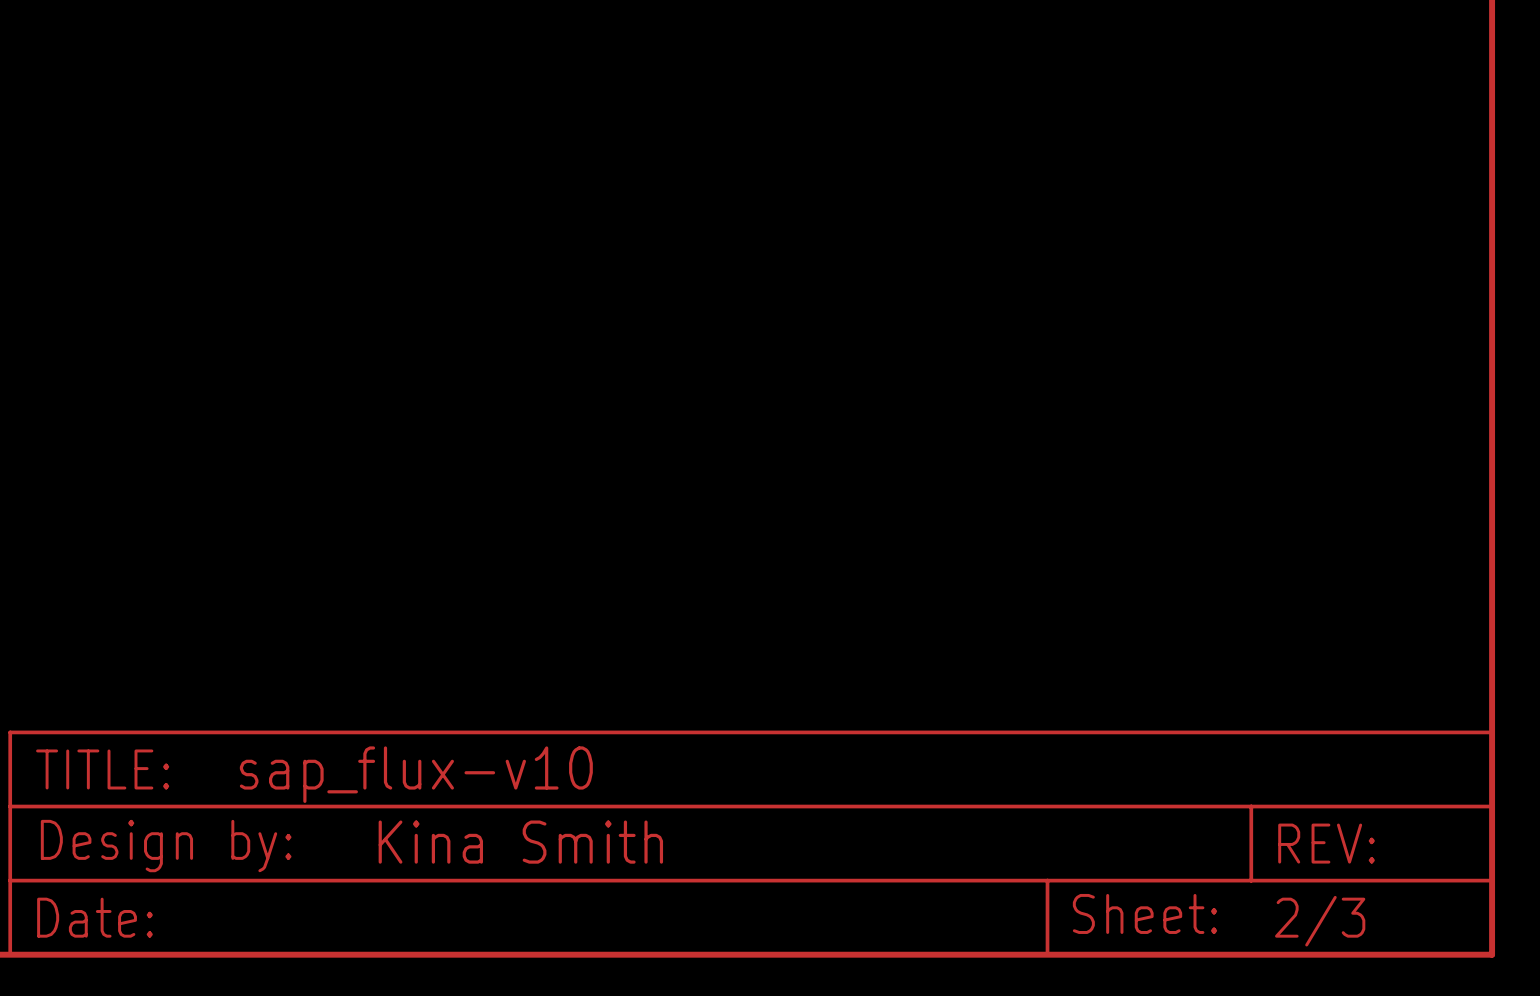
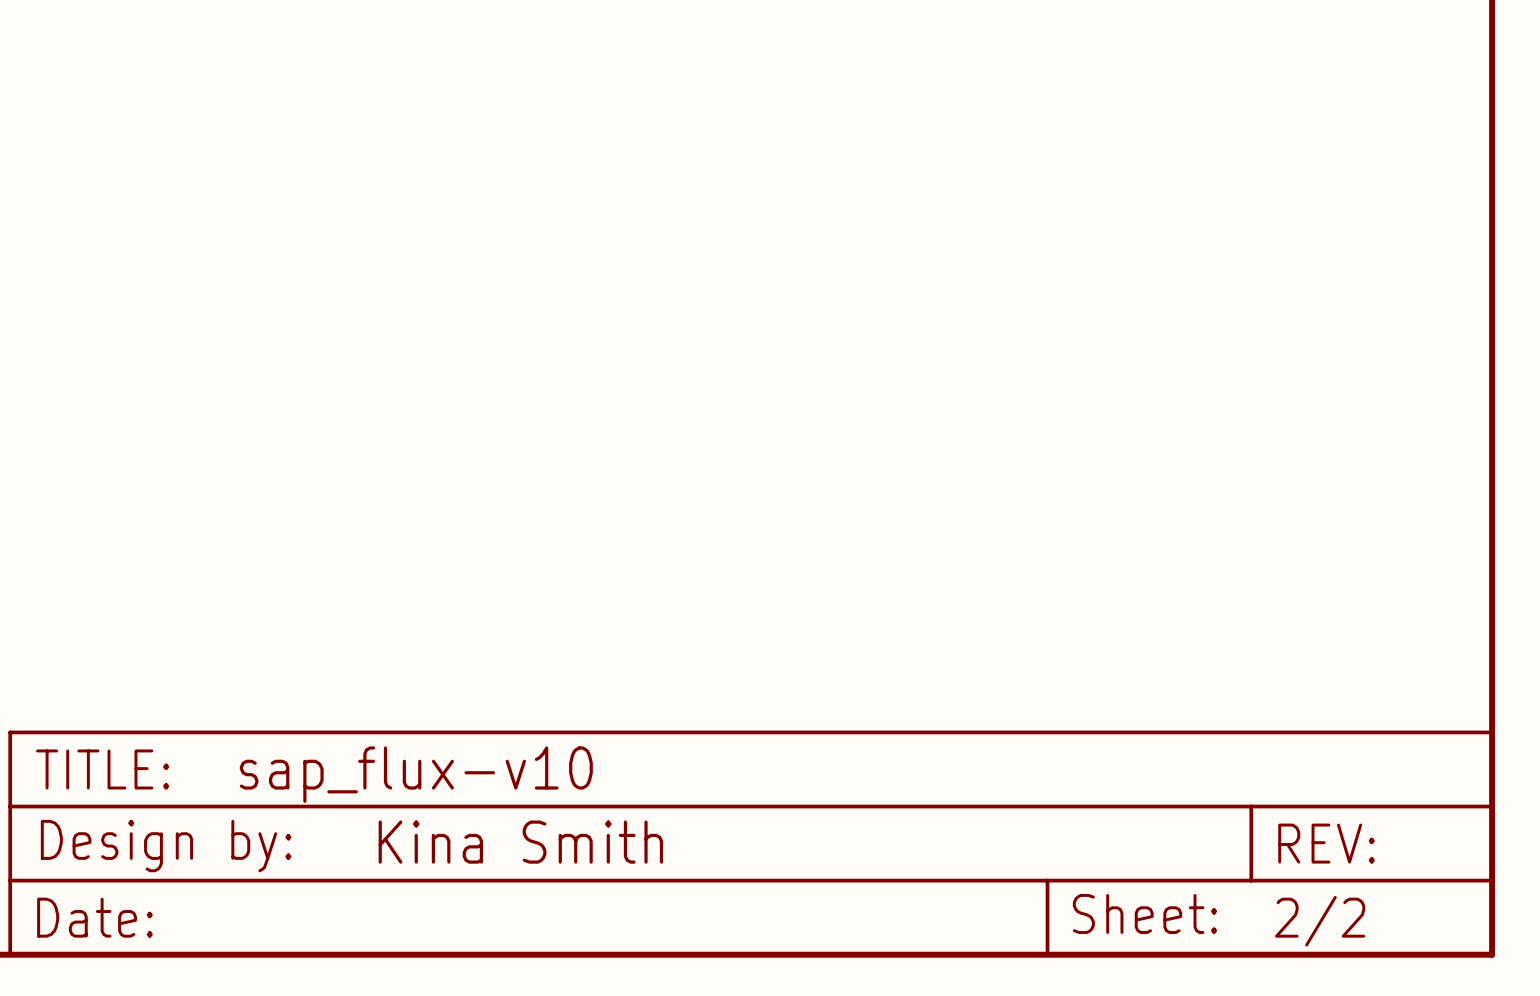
part text: 2/3 (1320, 921) -> 2/2 (1320, 921)

